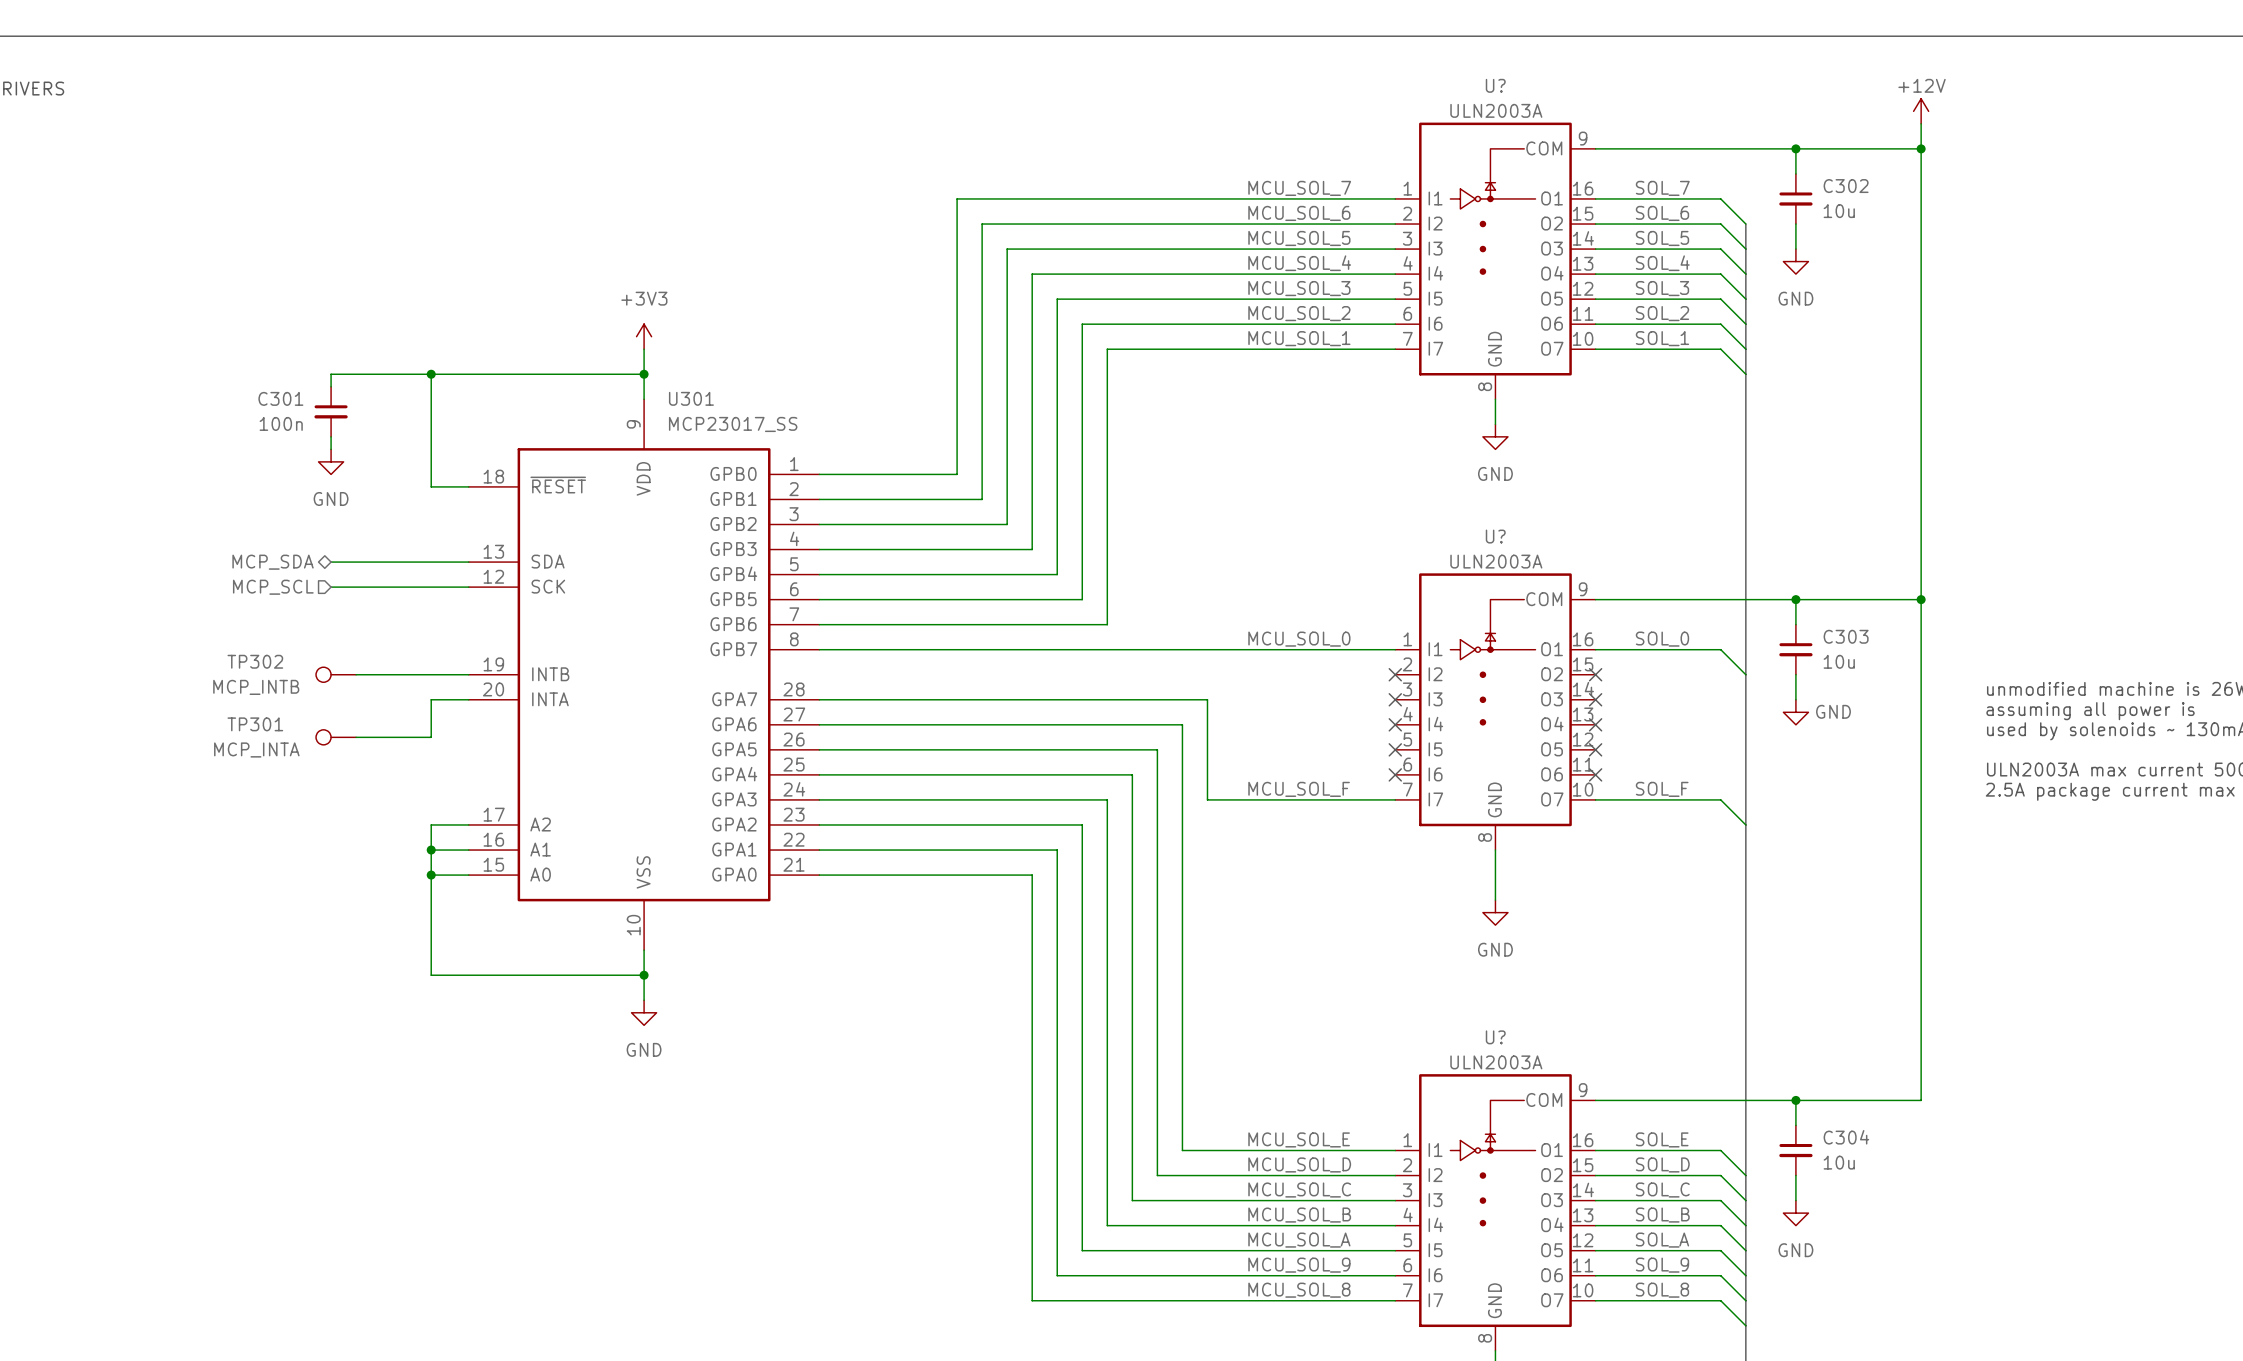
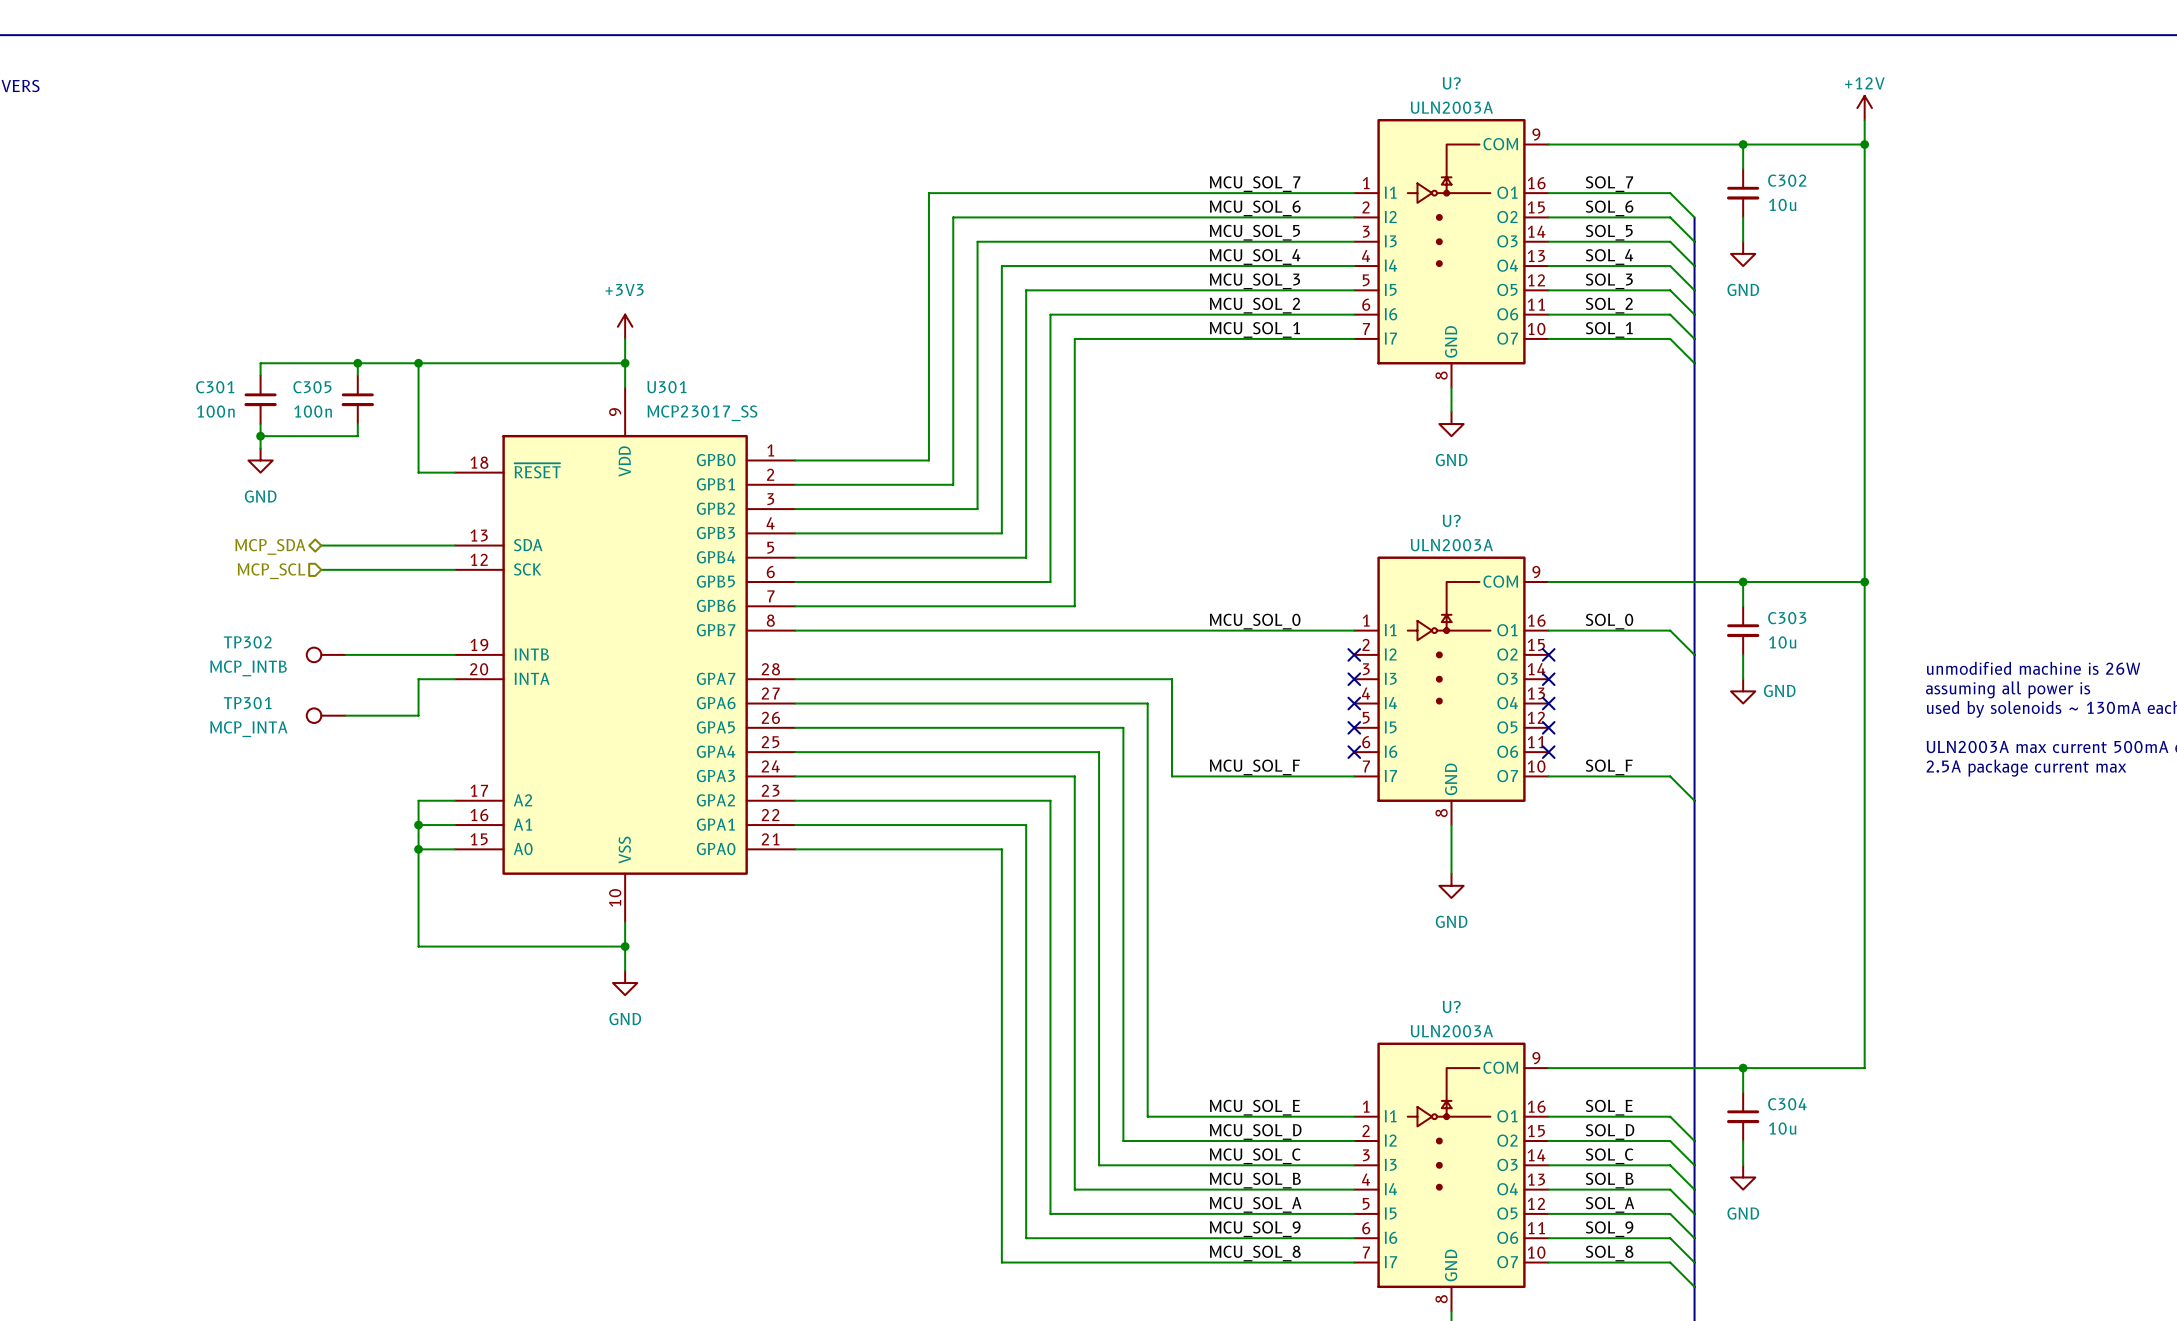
wire: (331, 374) (331, 386) -> (321, 363) (260, 363) (260, 375)
junction: none -> (357, 363)
C301 position: (331, 411) -> (260, 399)
C305: none -> 100n (357, 399)
wire: none -> (260, 424) (260, 448)
wire: (331, 436) (331, 449) -> (357, 363) (357, 375)
wire: none -> (357, 424) (357, 436) (260, 436)
junction: none -> (260, 436)
power symbol position: GND (331, 461) -> GND (260, 460)

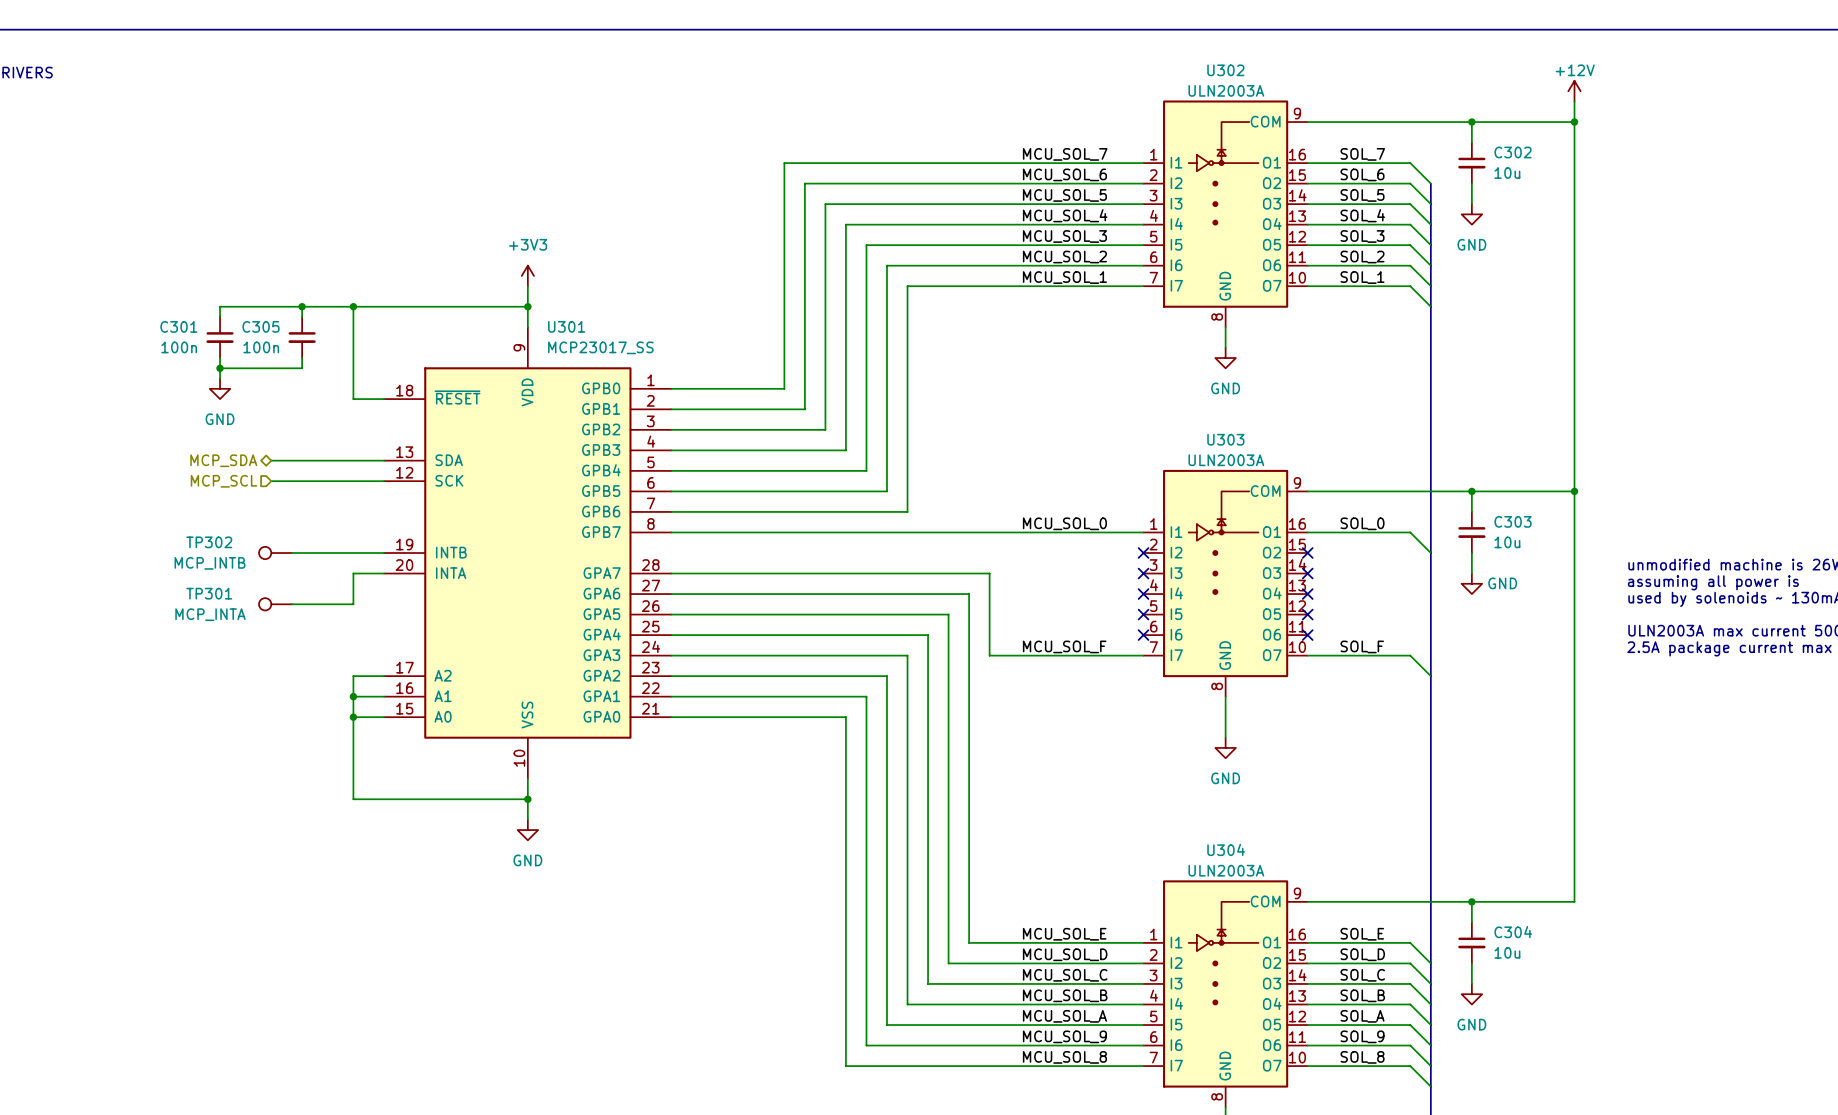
U? name: U? (1451, 83) -> U302 (1225, 70)
U? name: U? (1451, 520) -> U303 (1225, 439)
U? name: U? (1451, 1006) -> U304 (1226, 849)

